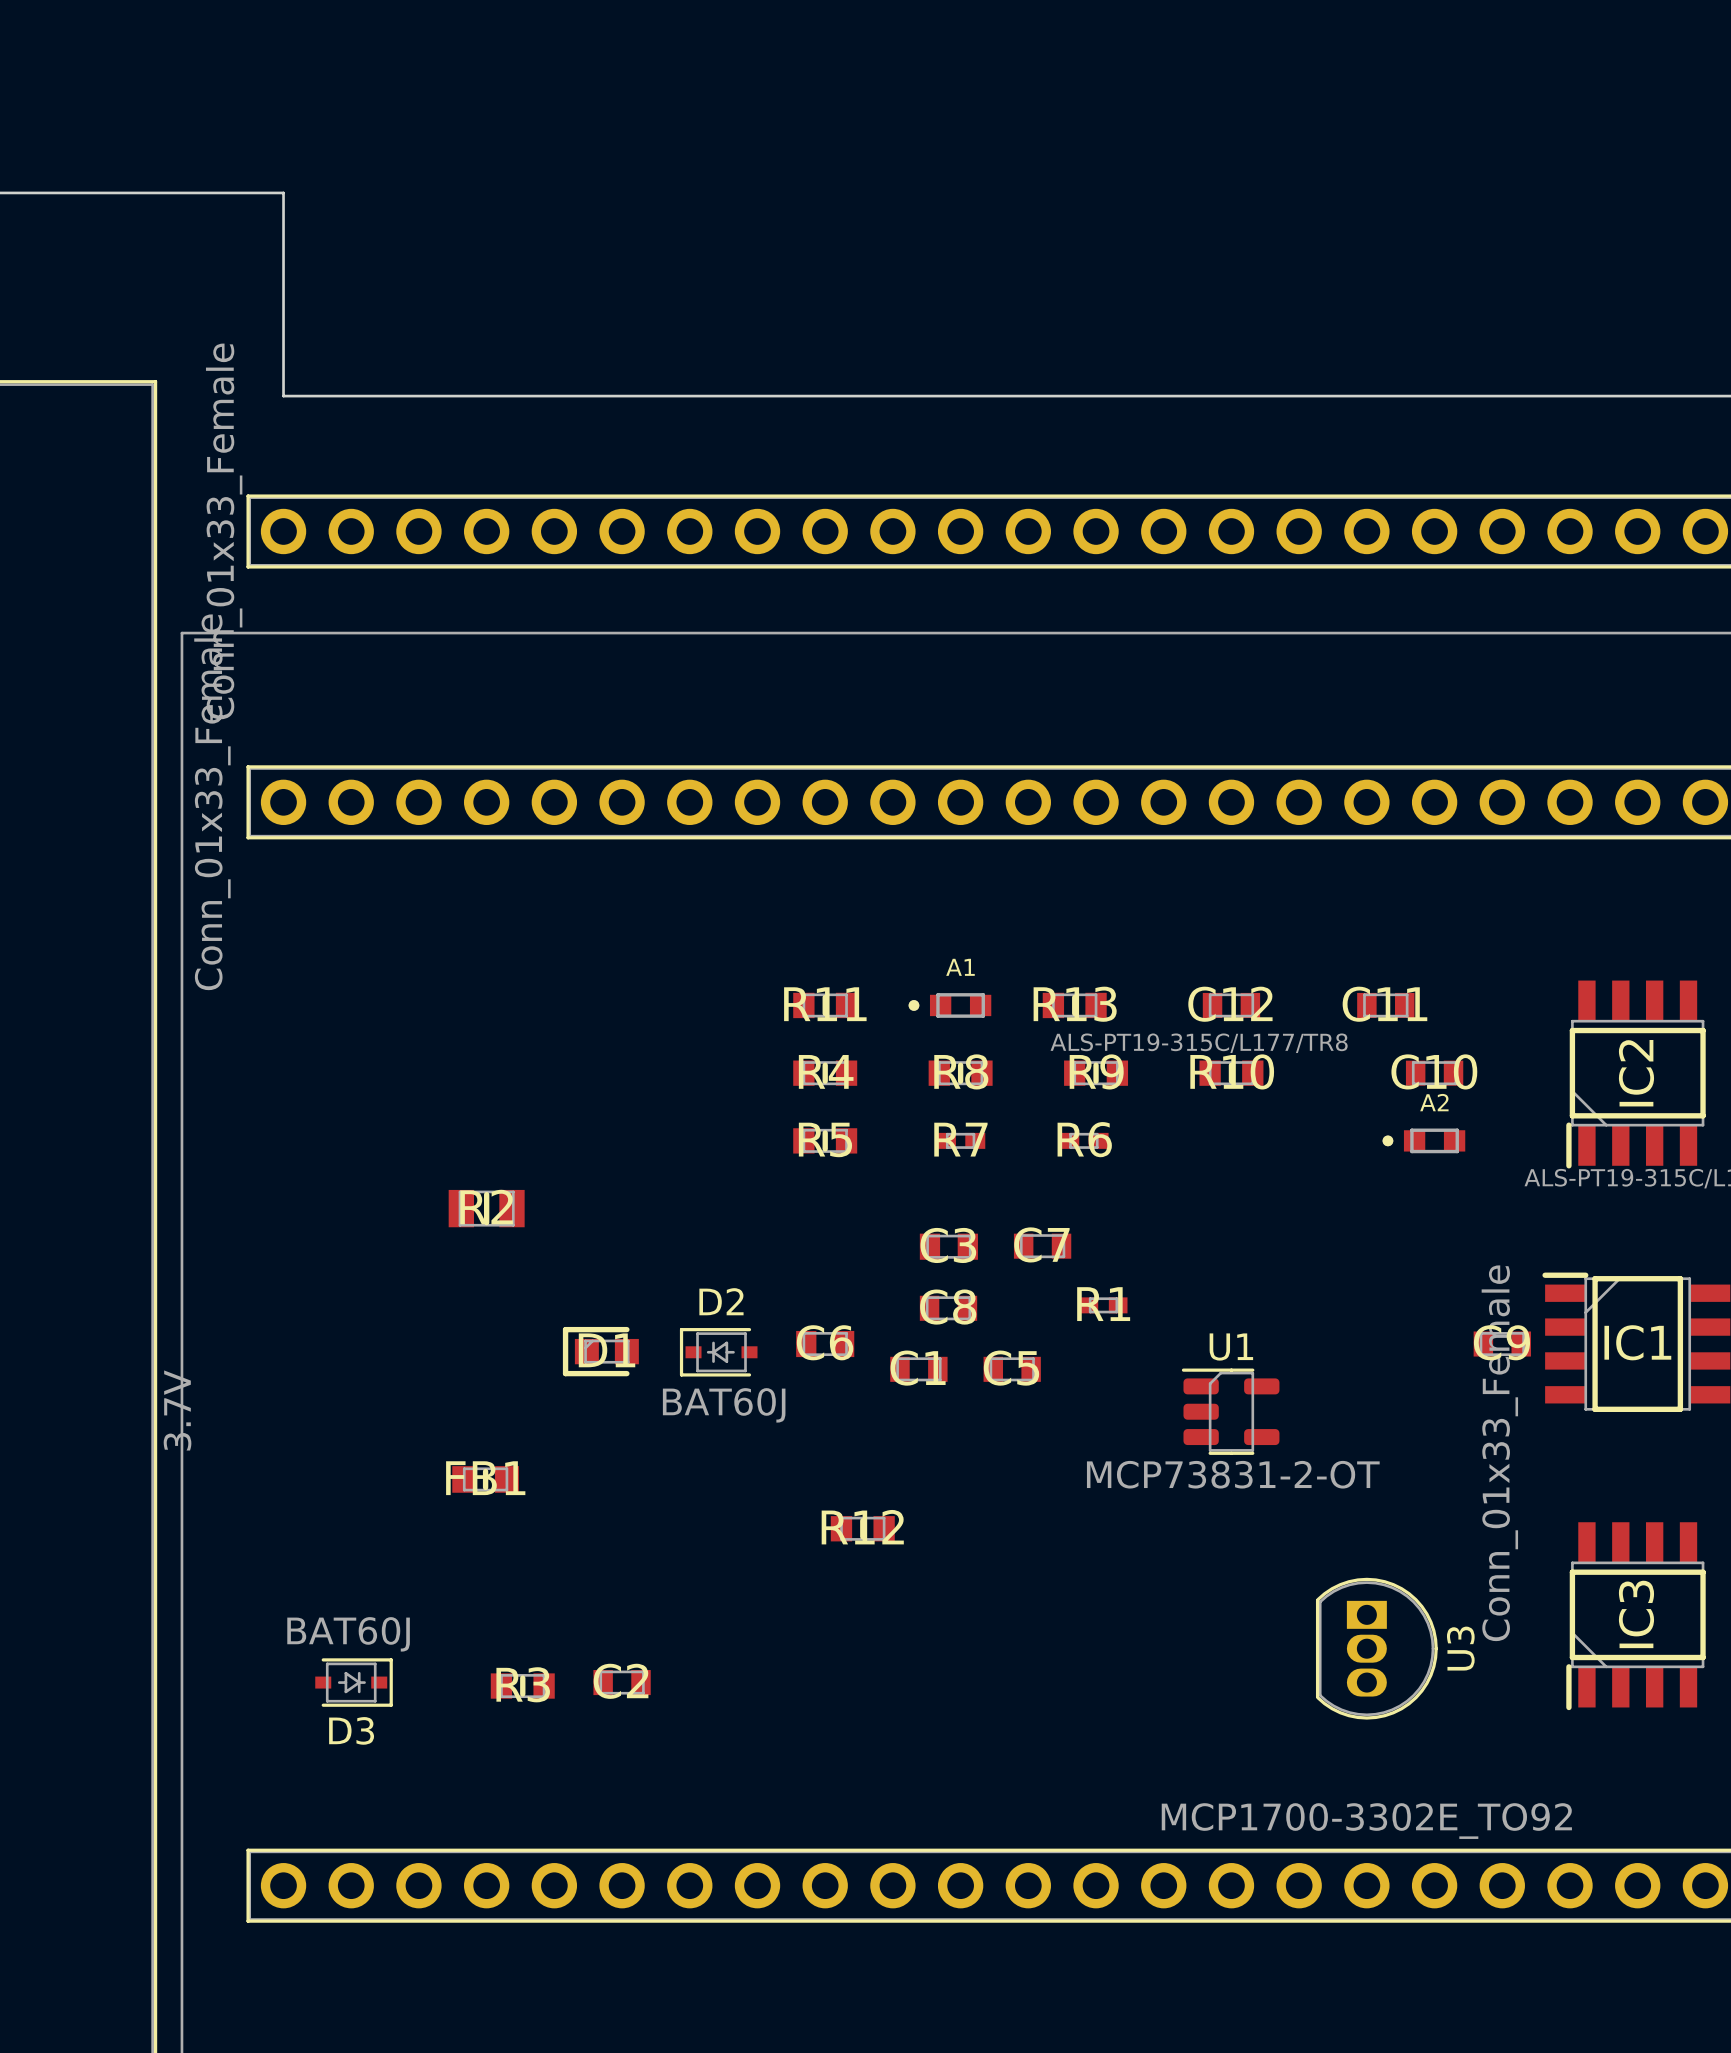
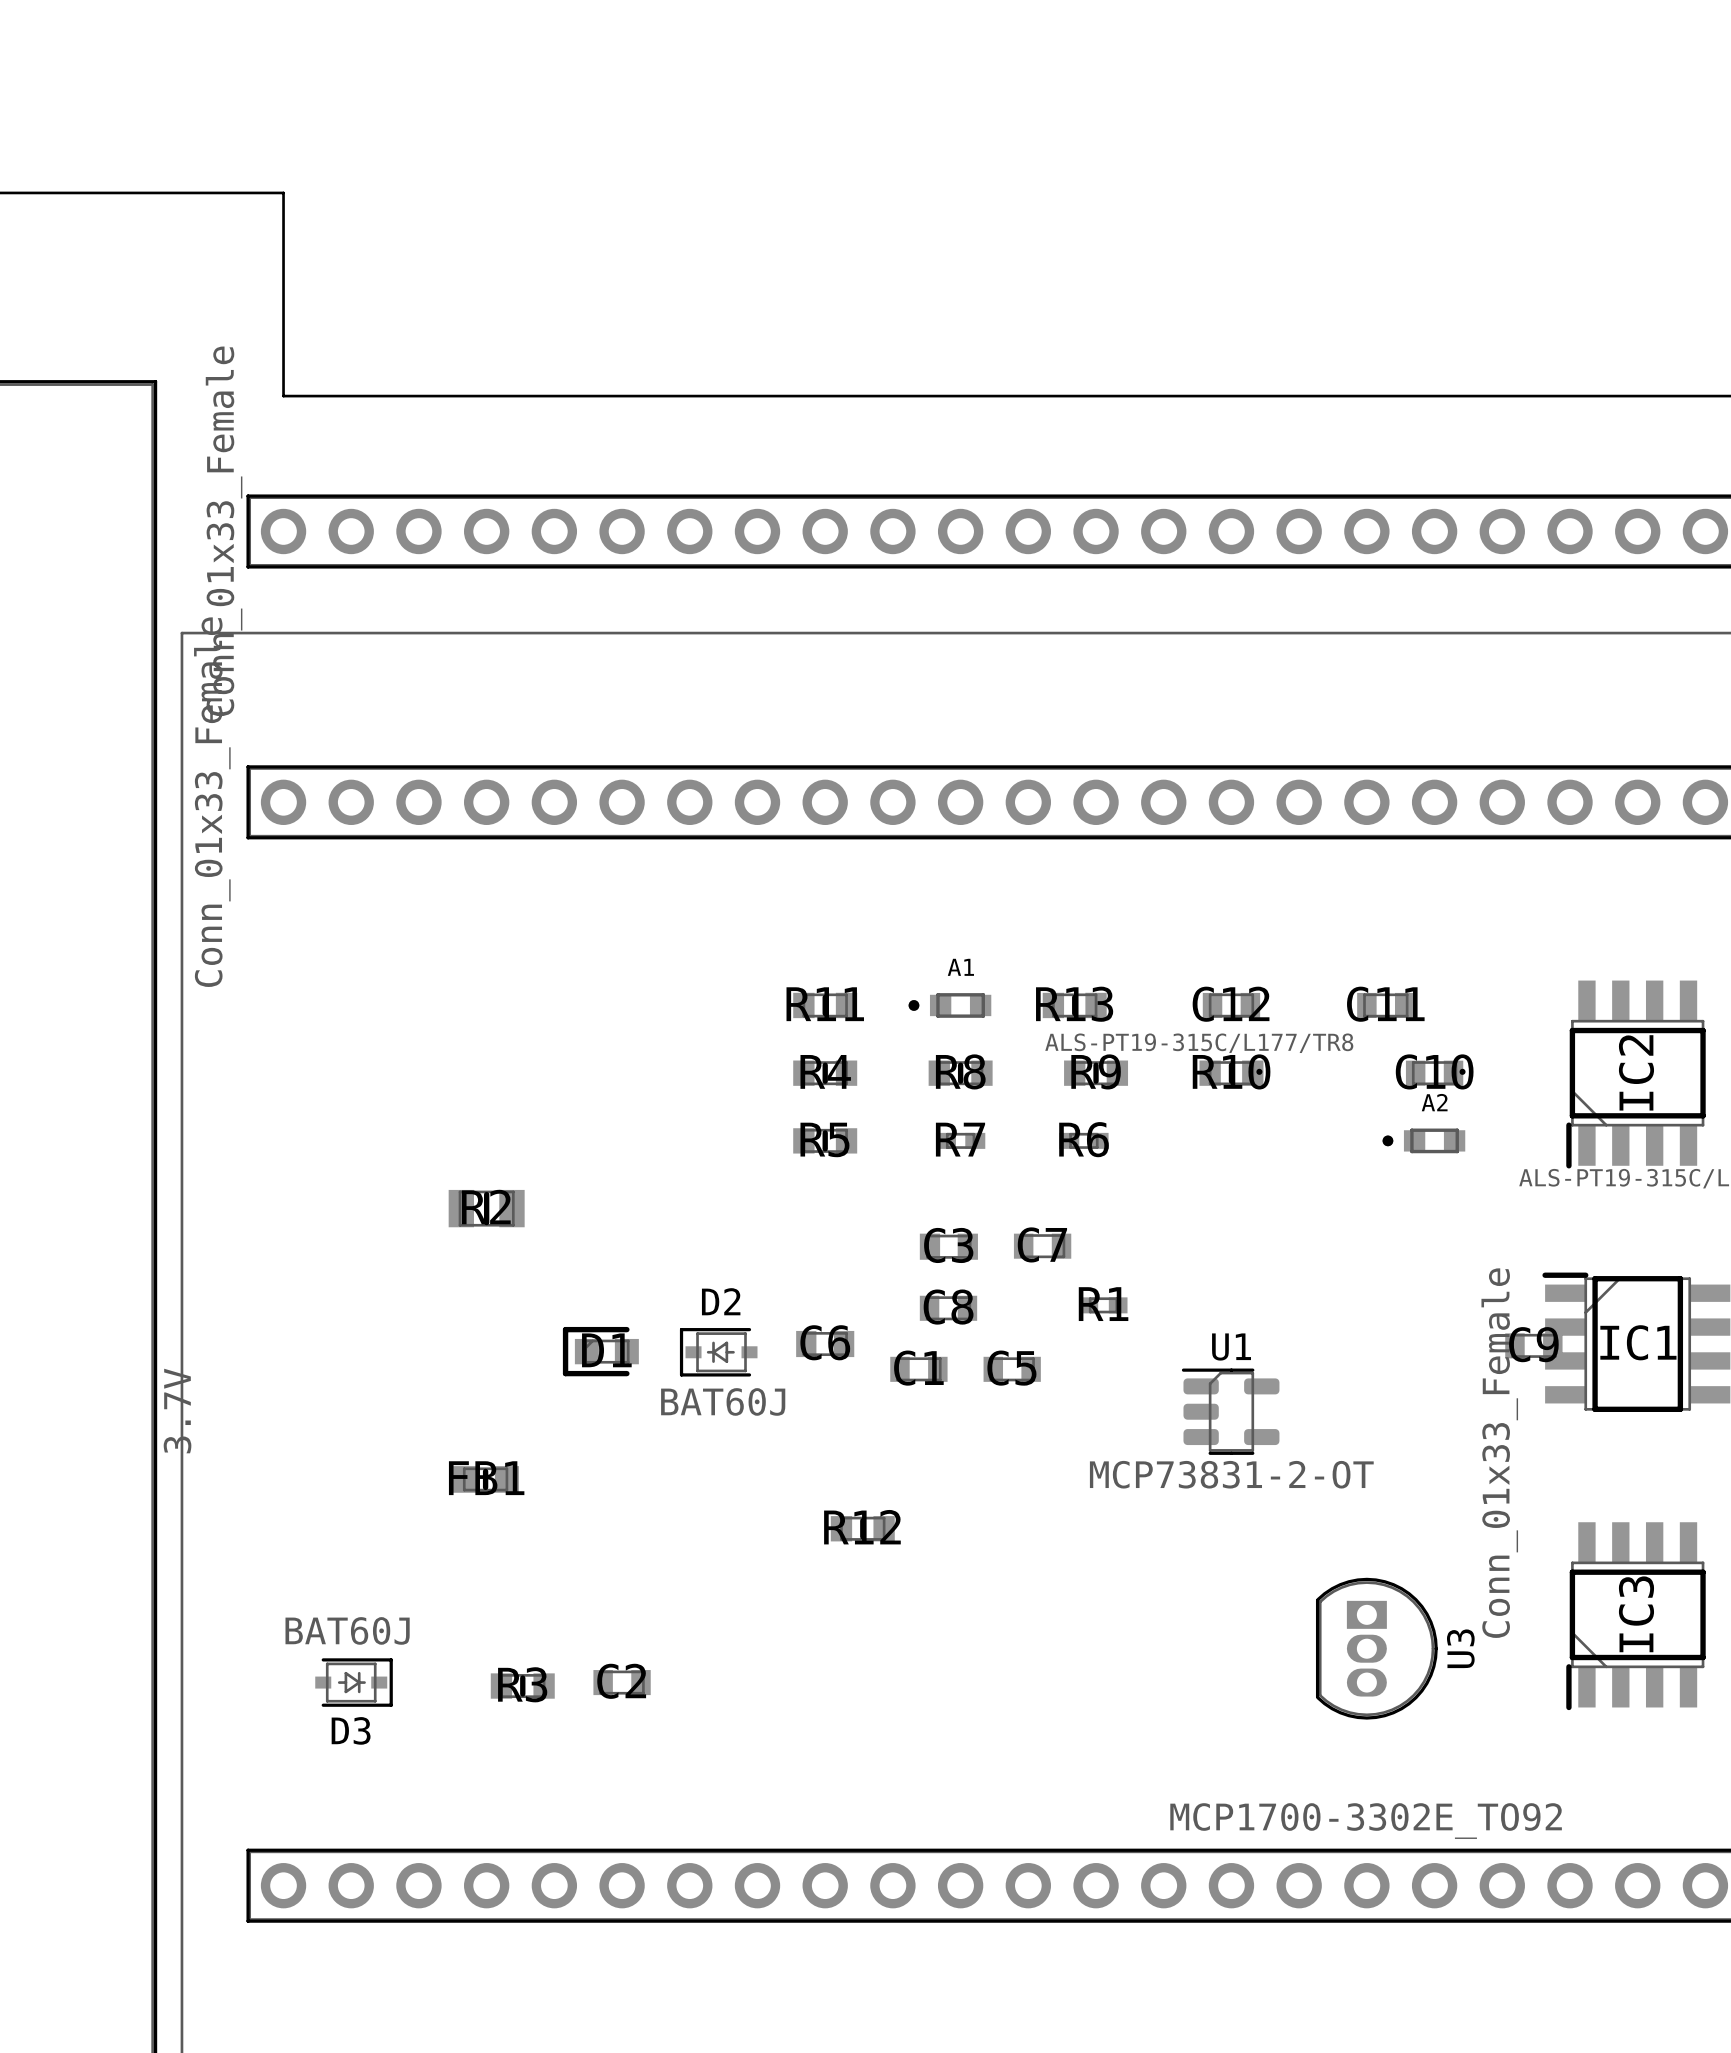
C9 position: (1502, 1344) -> (1533, 1345)

